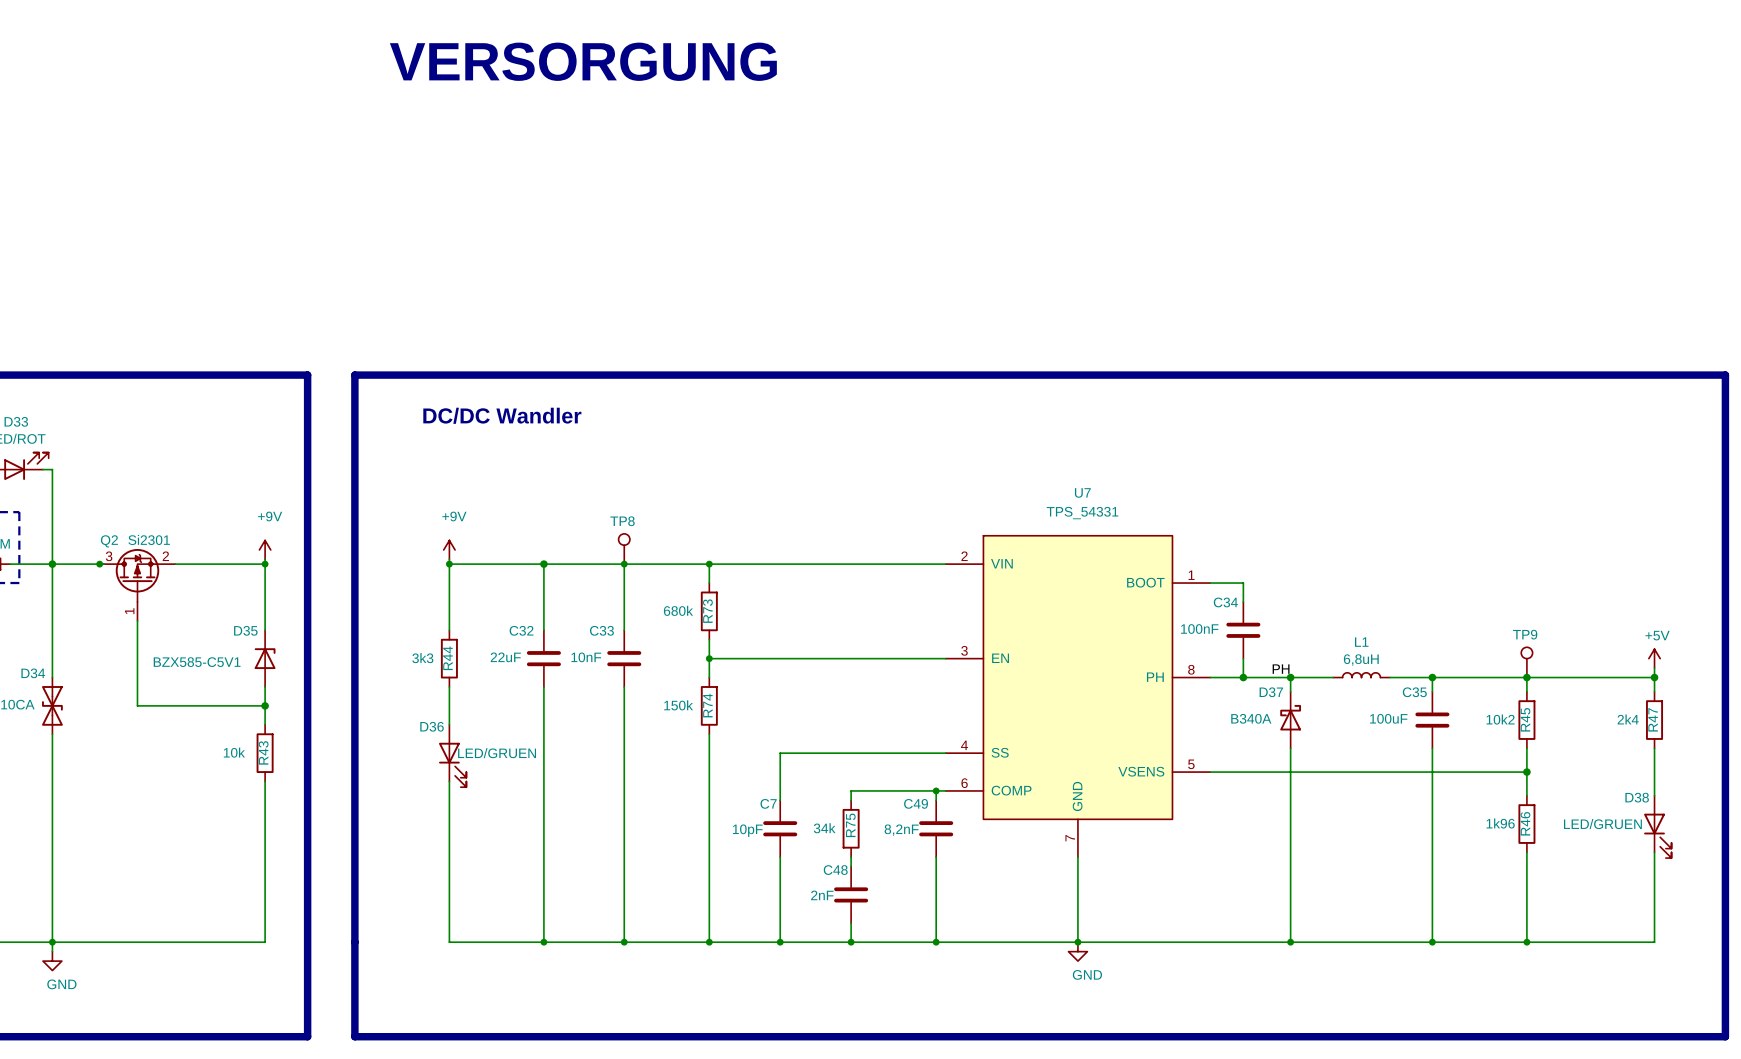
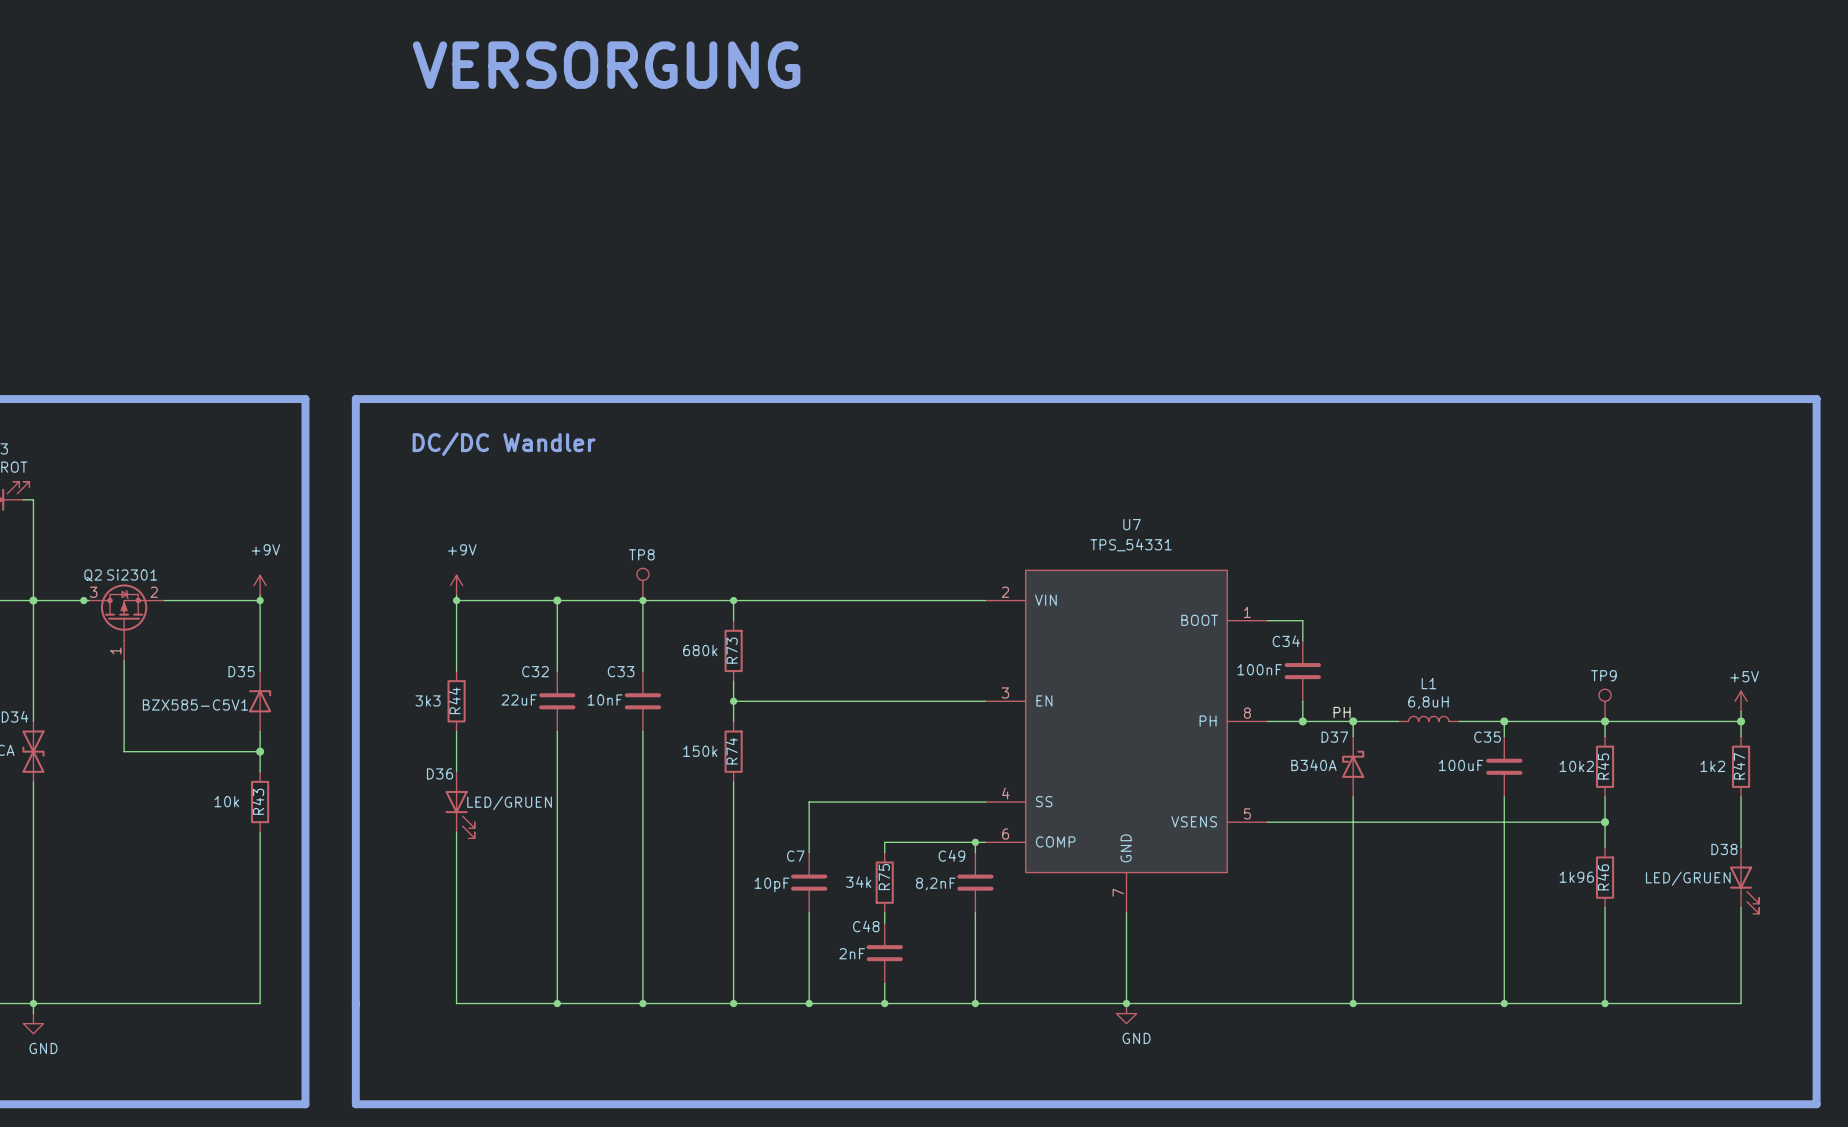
R47 value: 2k4 (1628, 719) -> 1k2 (1712, 766)

